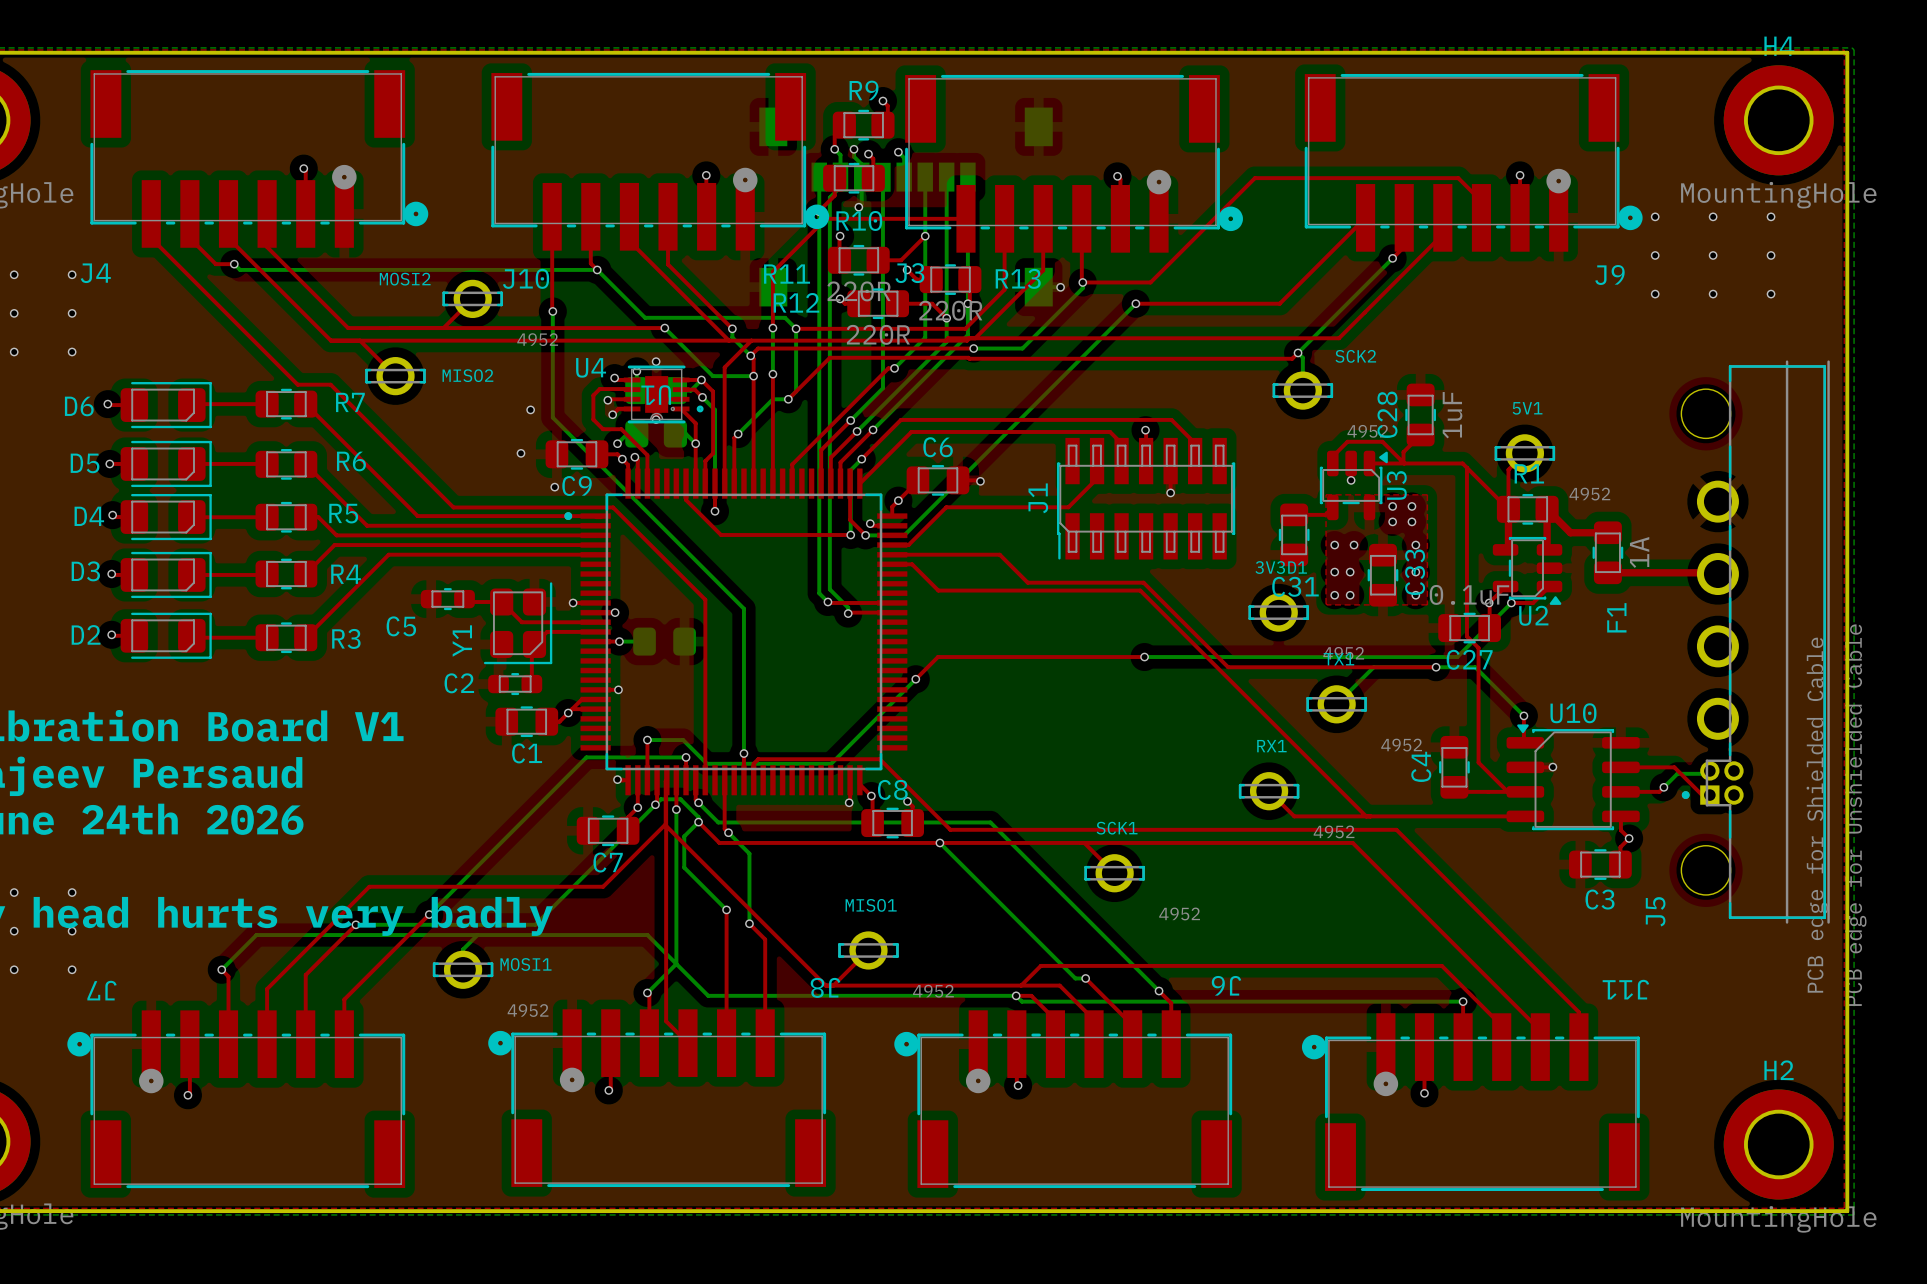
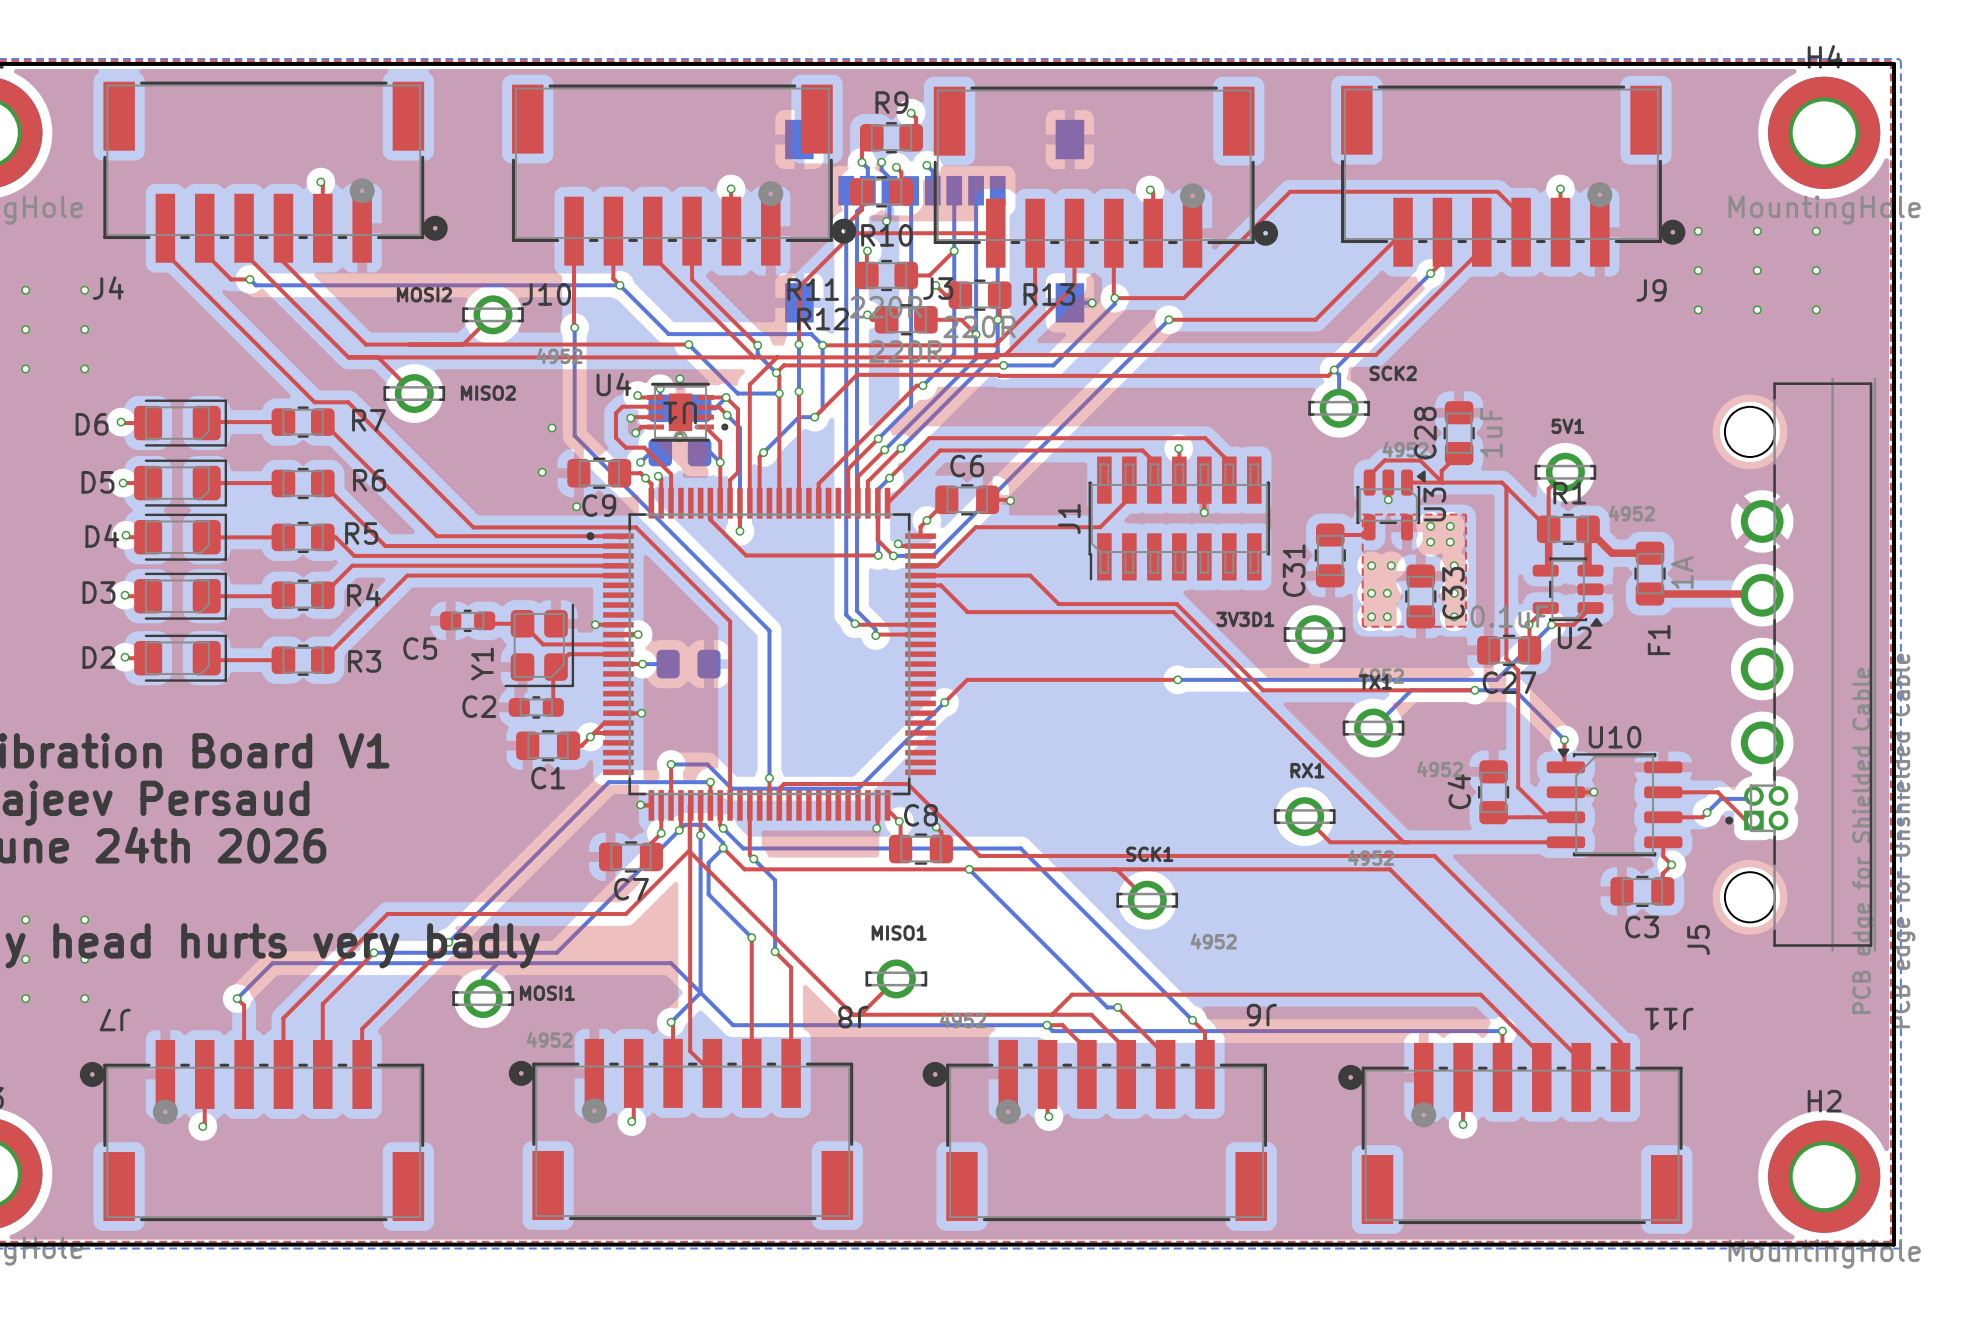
3V3D1 name position: 3V3D1 (1281, 567) -> 3V3D1 (1245, 619)
C31 name rotation: 0° (1295, 586) -> 90° counterclockwise (1294, 570)

